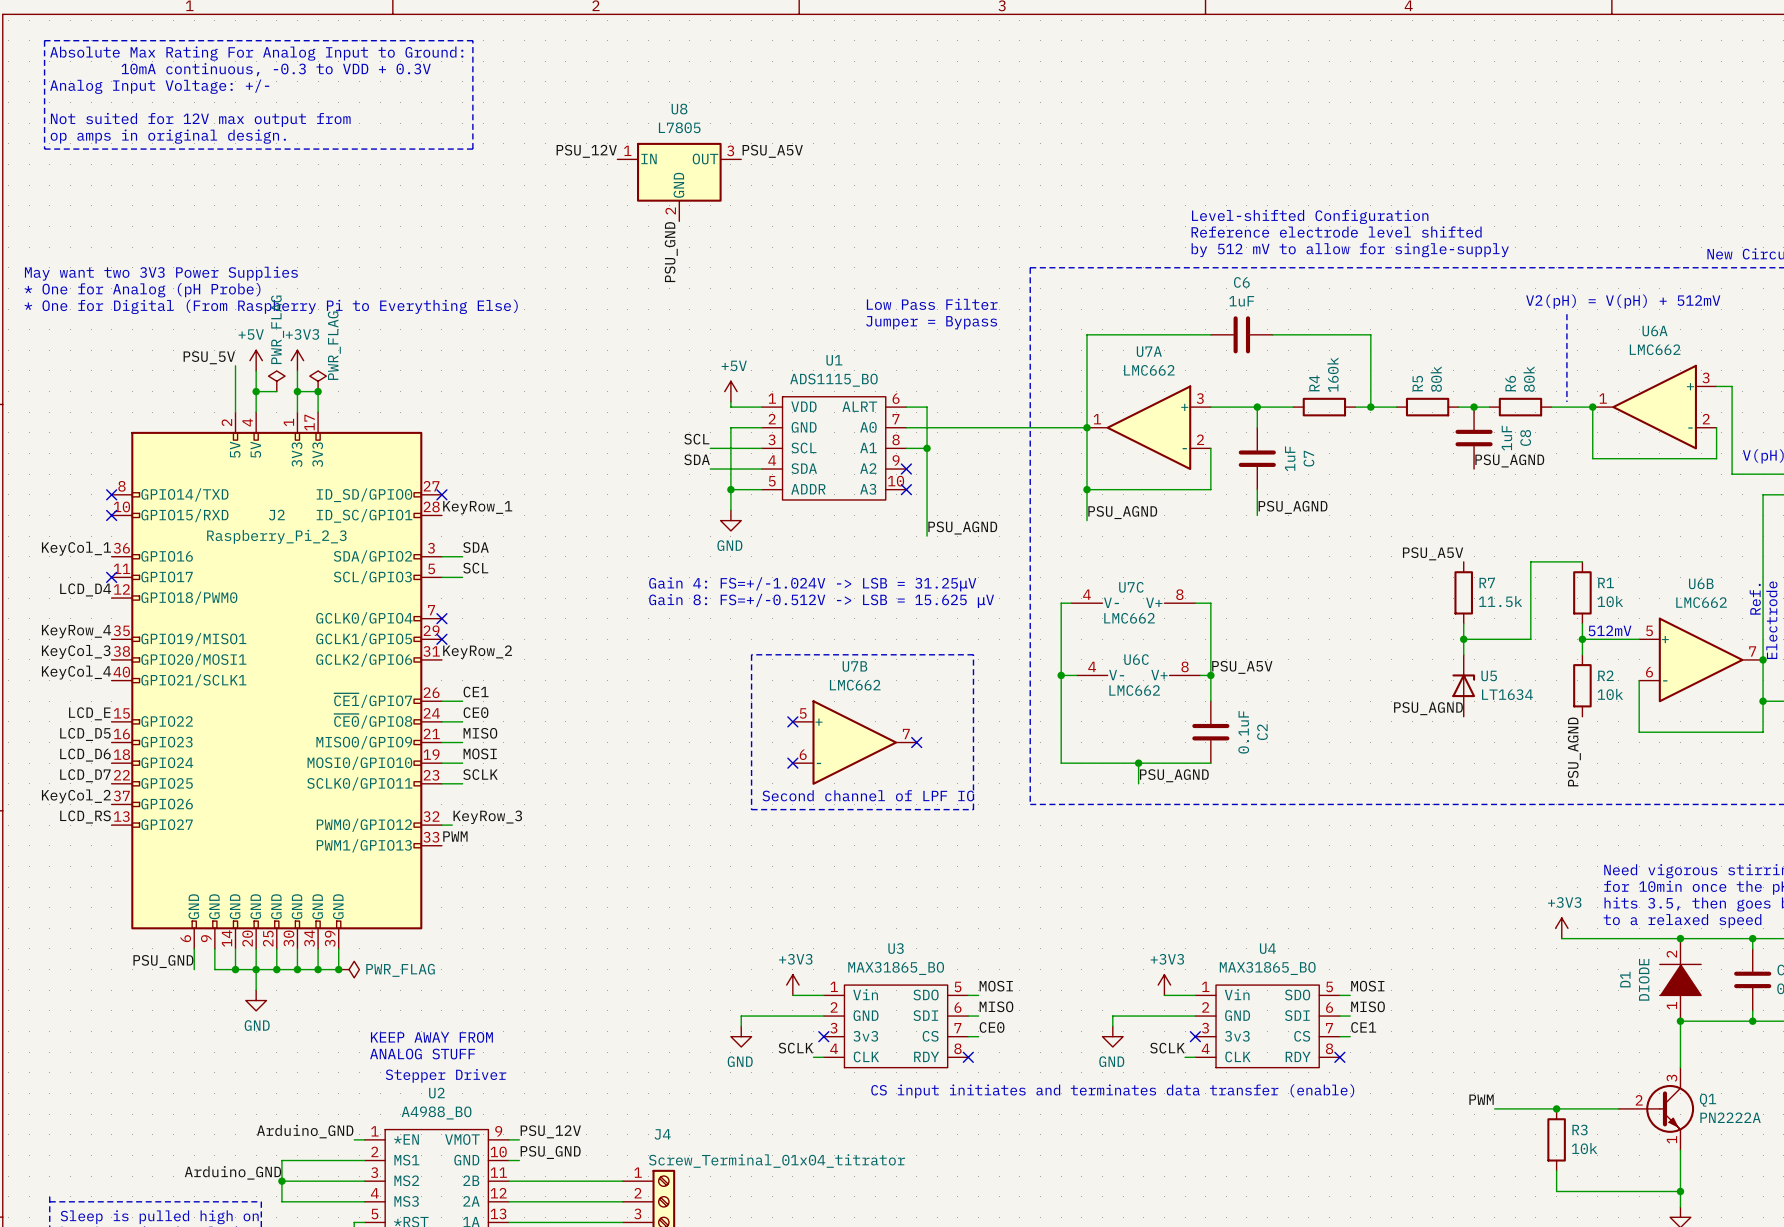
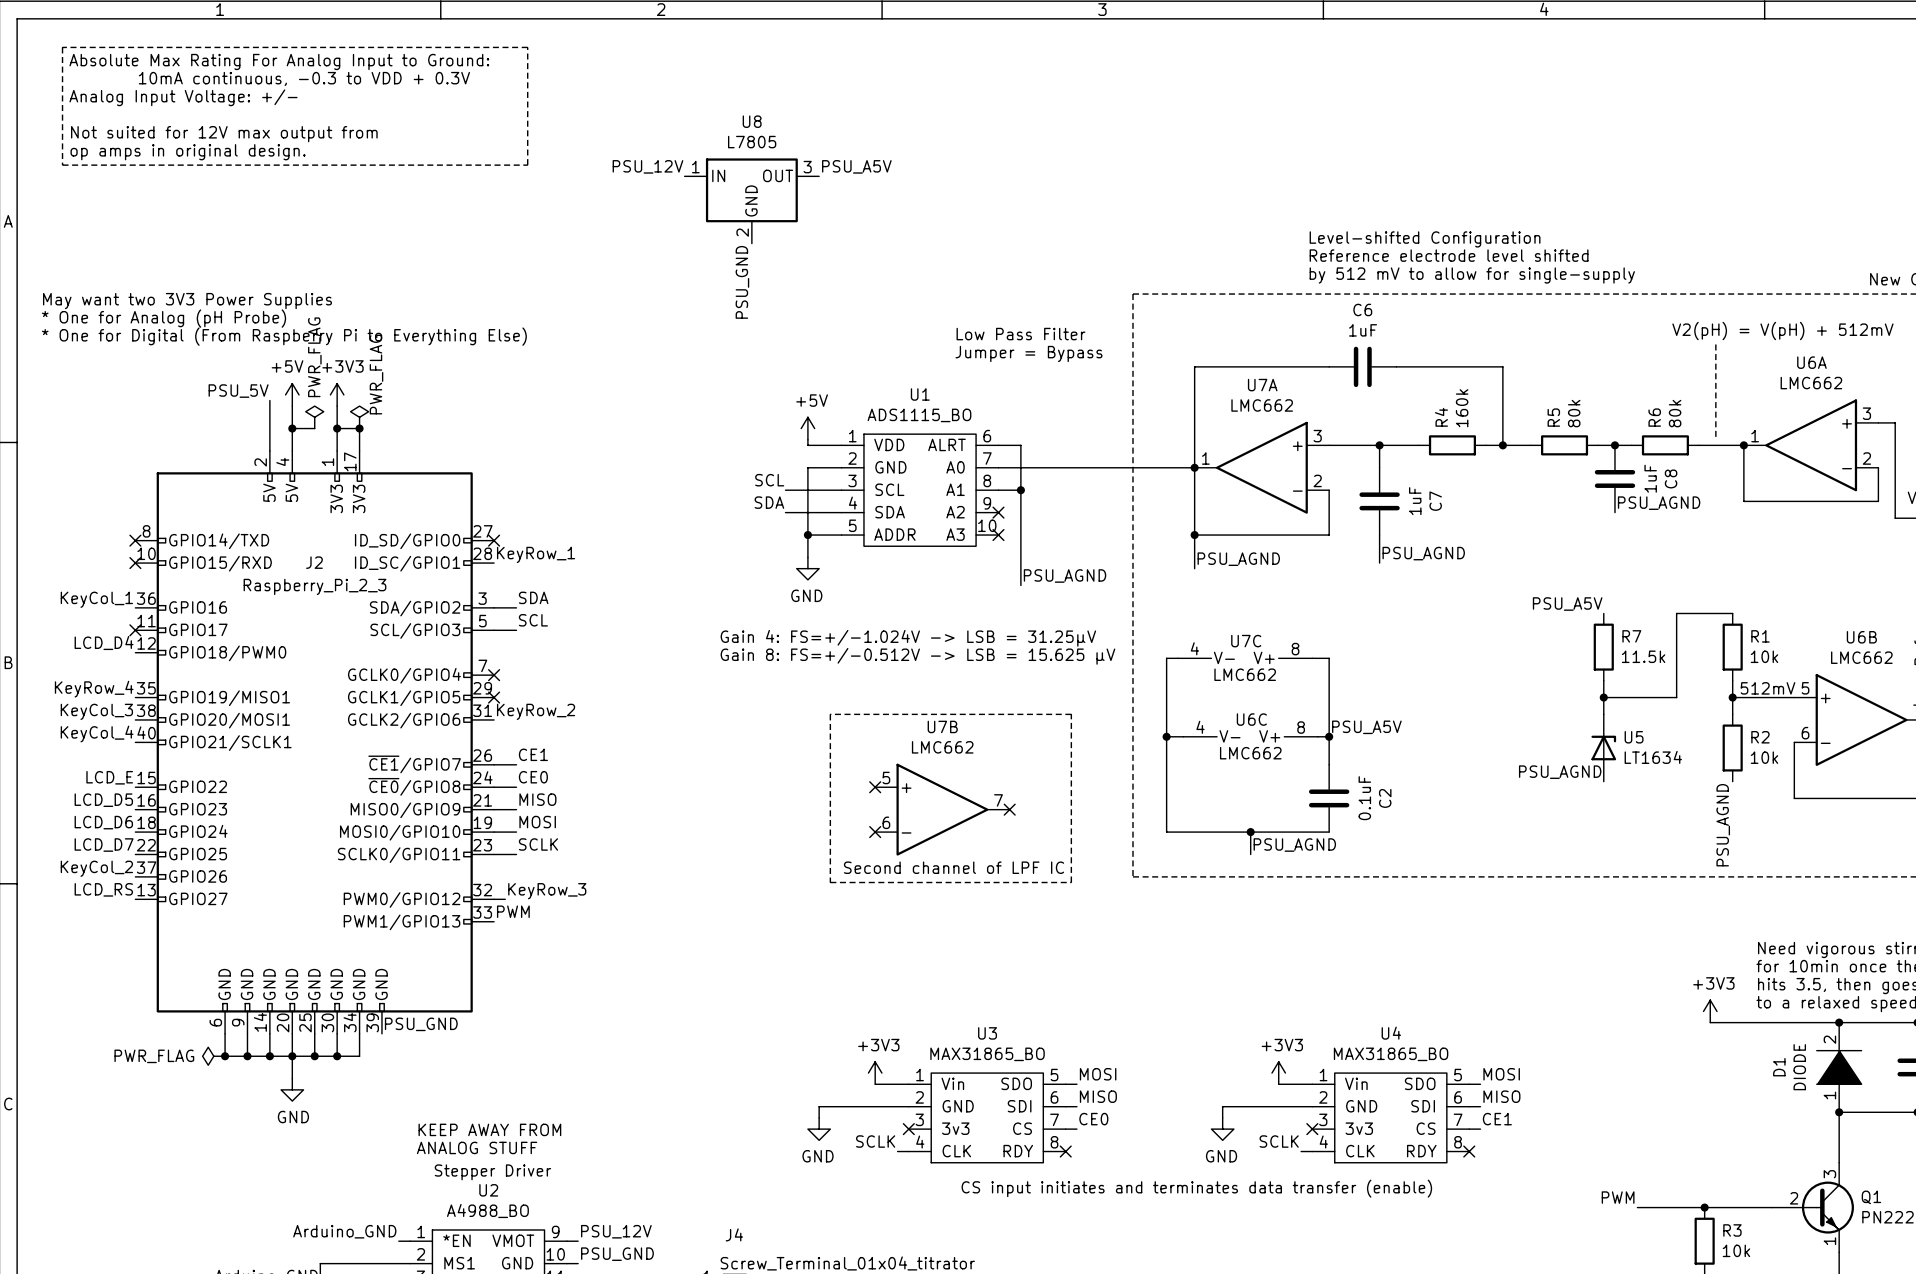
wire: (338, 948) (338, 969) (318, 969) -> none
label position: PSU_GND (163, 961) -> PSU_GND (421, 1024)
wire: none -> (225, 1056) (247, 1056)
junction: none -> (225, 1056)
junction: none -> (247, 1056)
junction: (318, 969) -> none
junction: (338, 969) -> none
power symbol rotation: 0° (349, 969) -> 180° (213, 1056)
power symbol position: PWR_FLAG (349, 969) -> PWR_FLAG (213, 1056)

